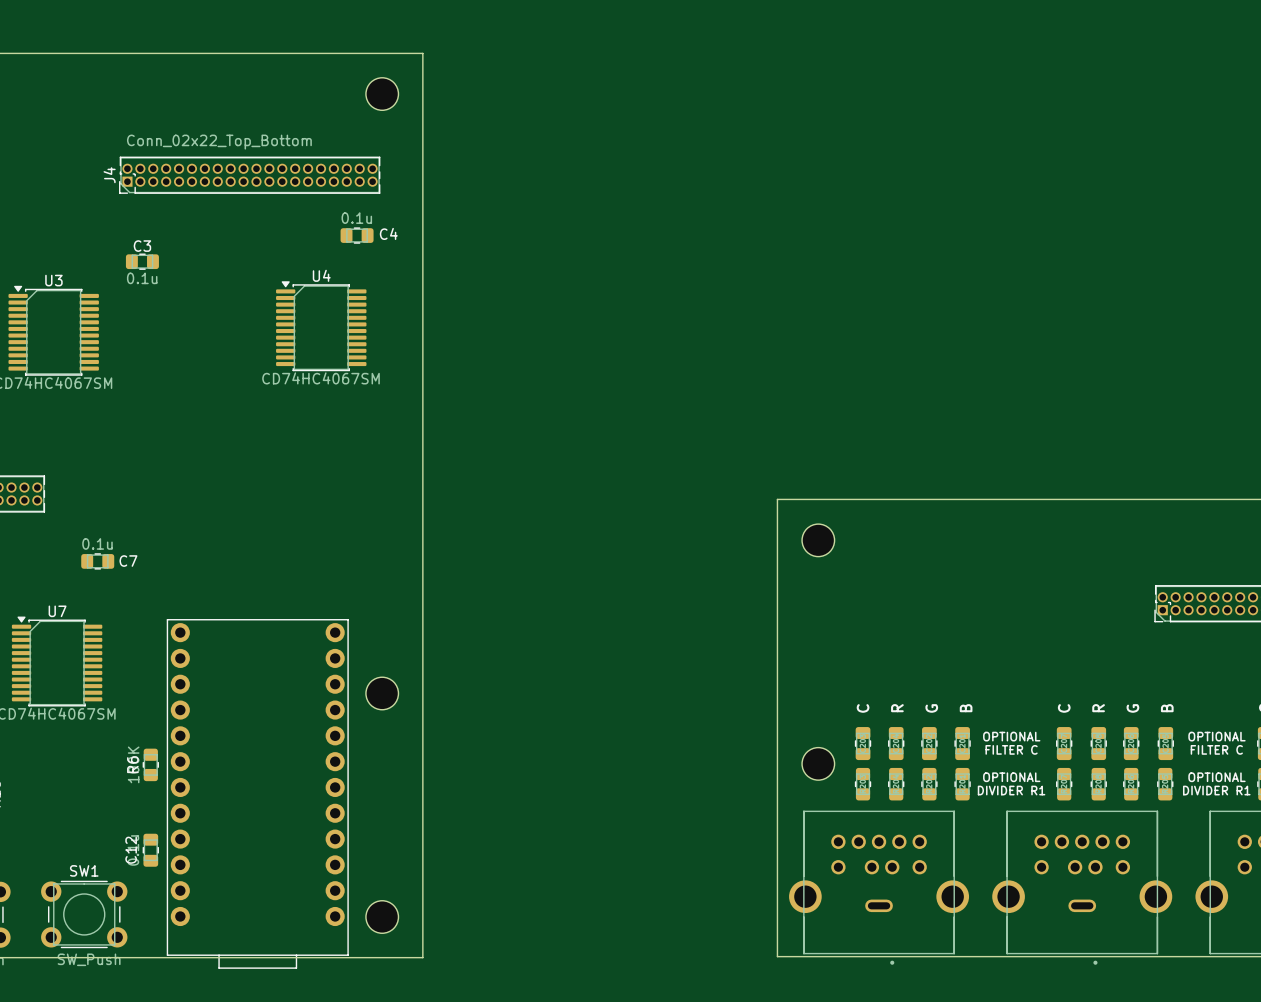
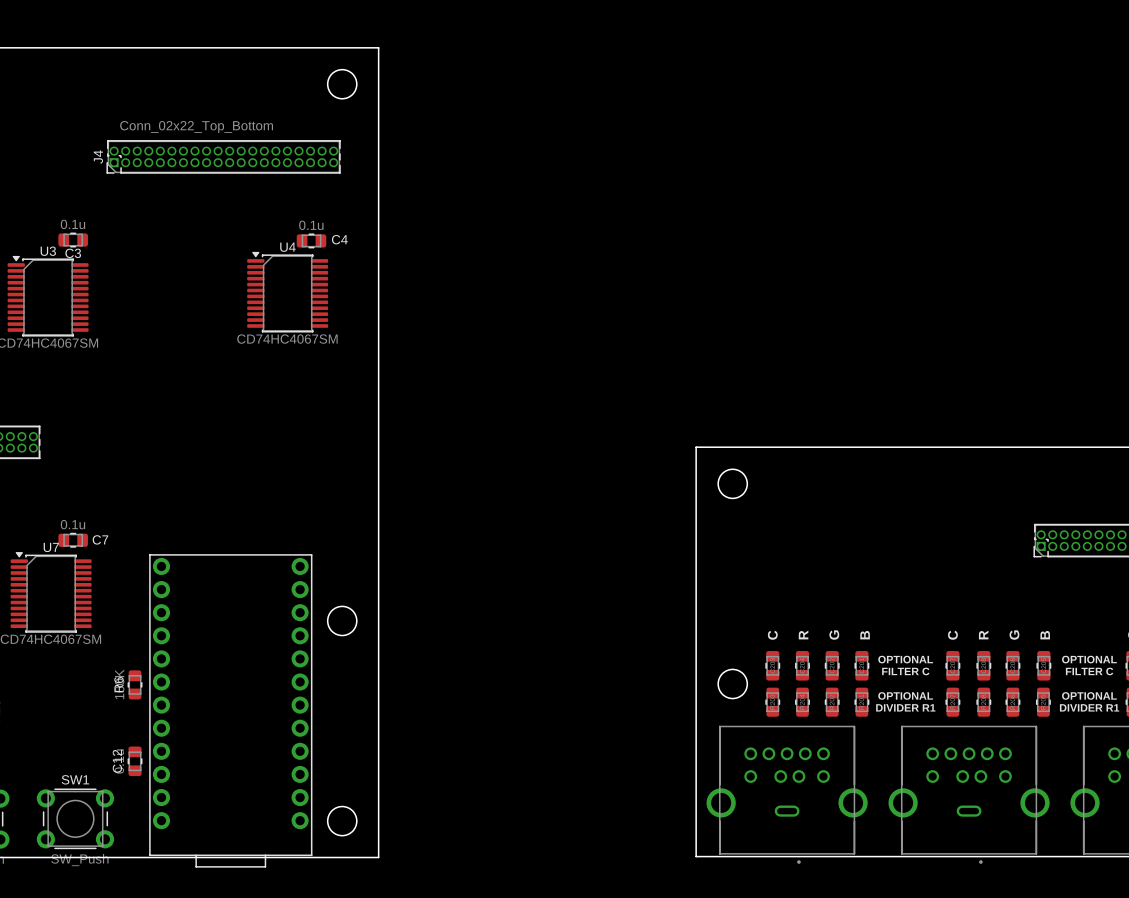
C4 position: (357, 235) -> (311, 240)
C3 name position: C3 (142, 246) -> C3 (73, 253)
C3 position: (142, 261) -> (73, 240)
C3 value position: 0.1u (142, 278) -> 0.1u (72, 224)
C7 position: (97, 561) -> (73, 540)

